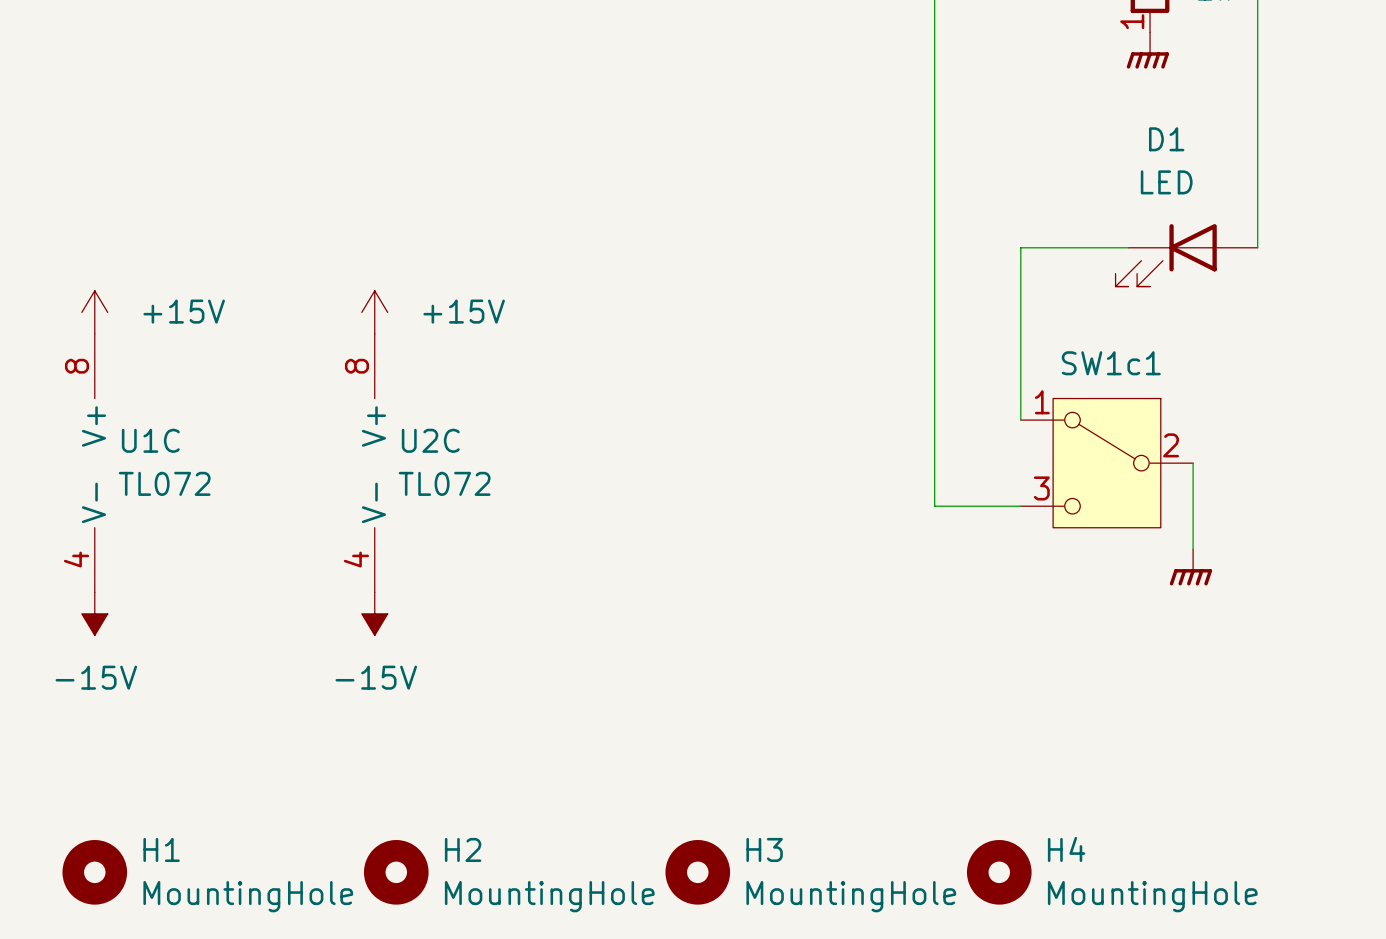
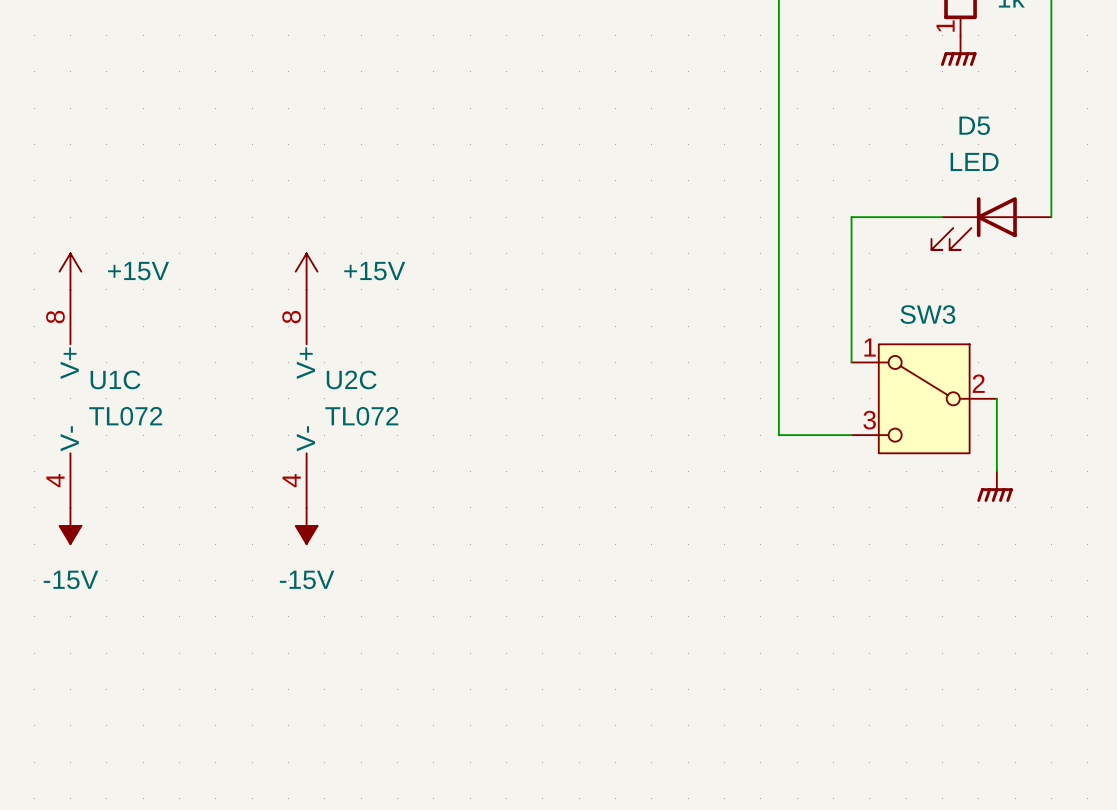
D1 name: D1 (1166, 139) -> D5 (974, 125)
SW1c1 name: SW1c1 (1111, 363) -> SW3 (927, 314)
H1: MountingHole (94, 872) -> none
H2: MountingHole (396, 872) -> none
H3: MountingHole (697, 872) -> none
H4: MountingHole (999, 872) -> none

